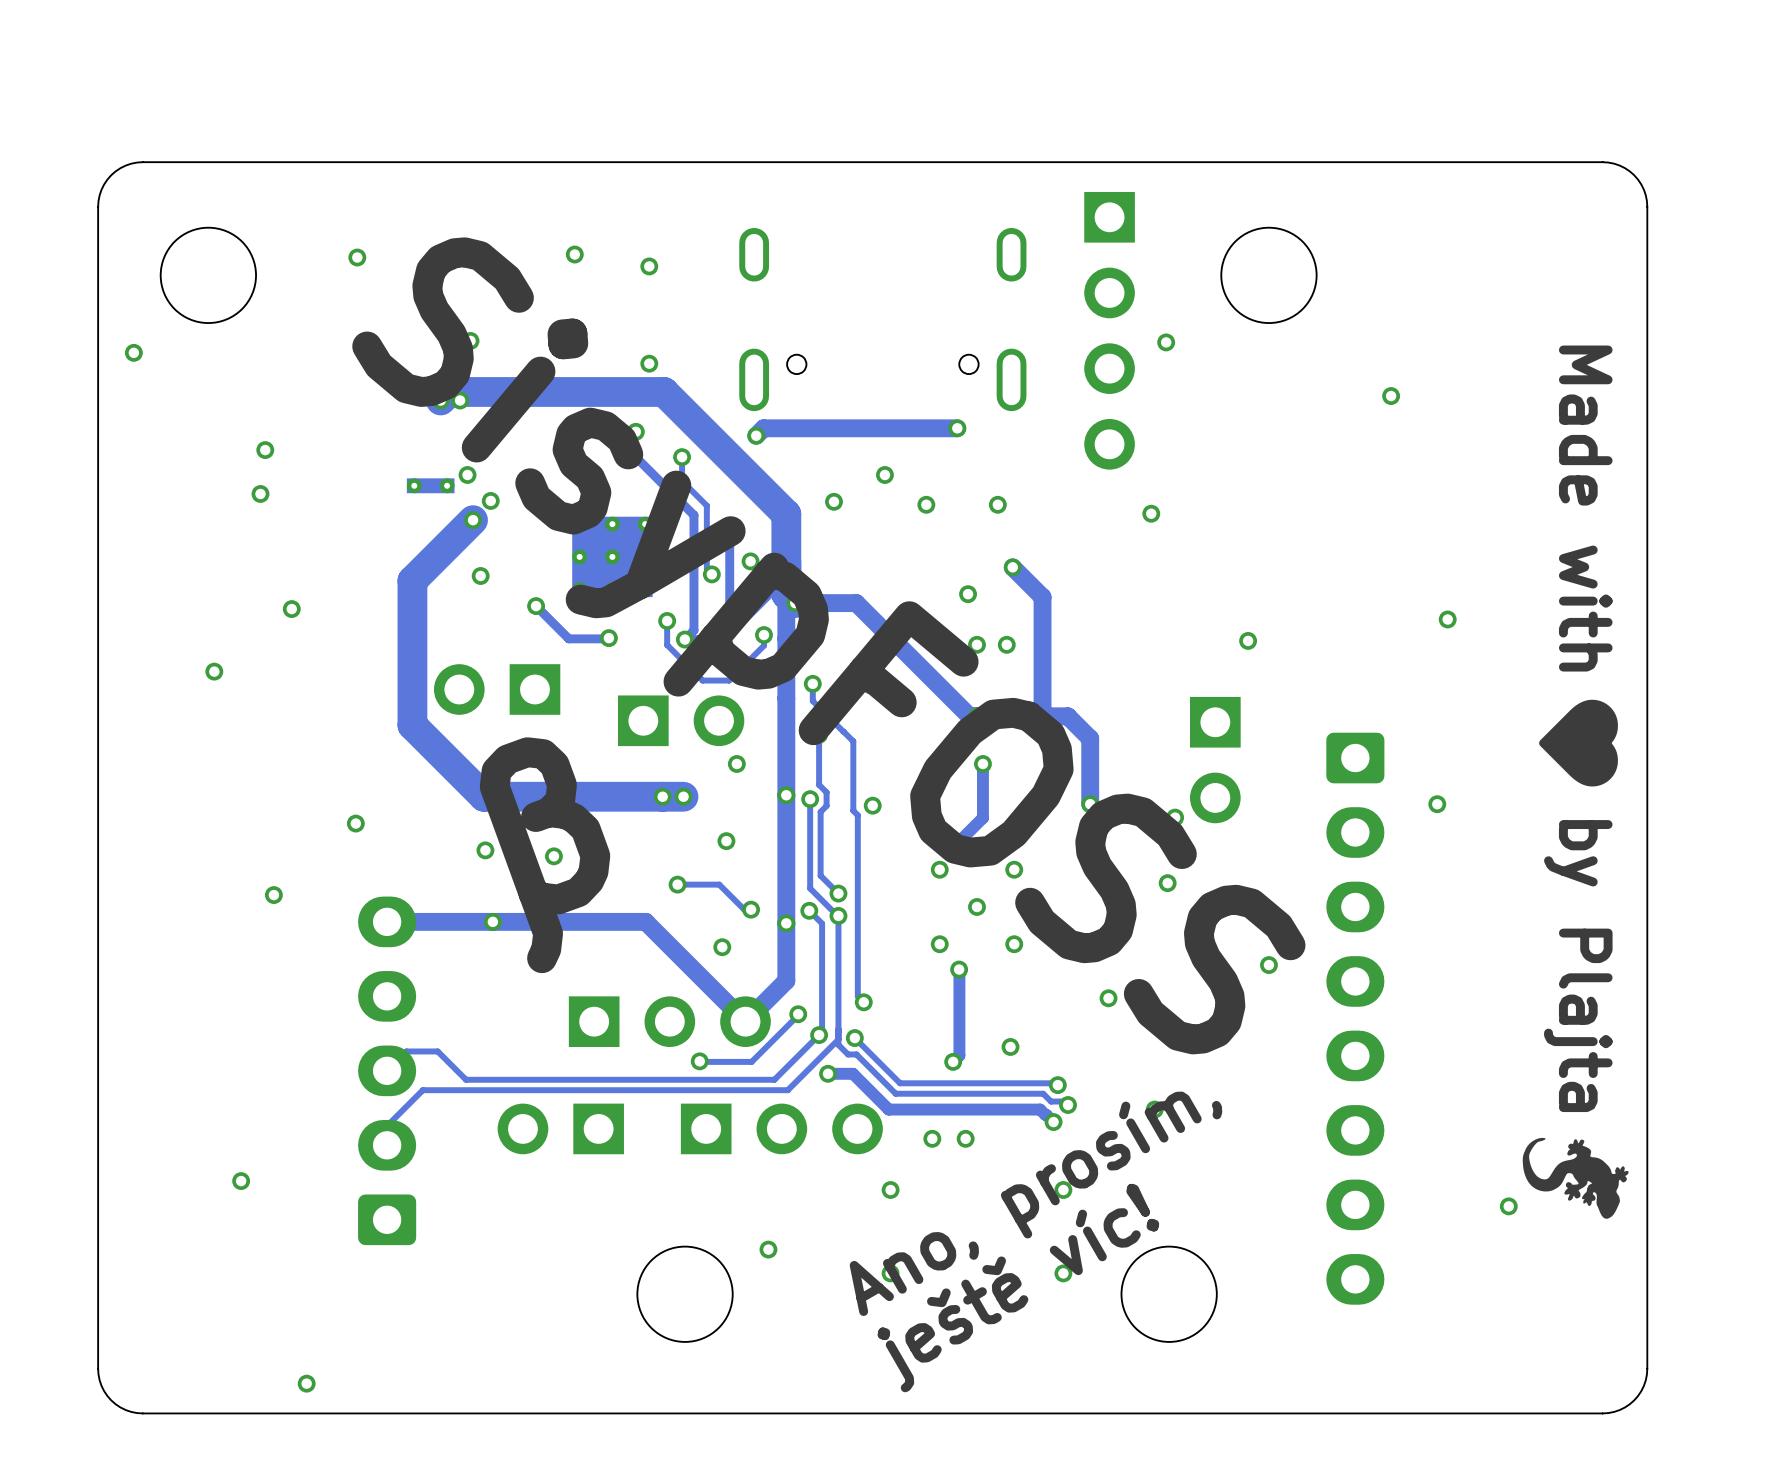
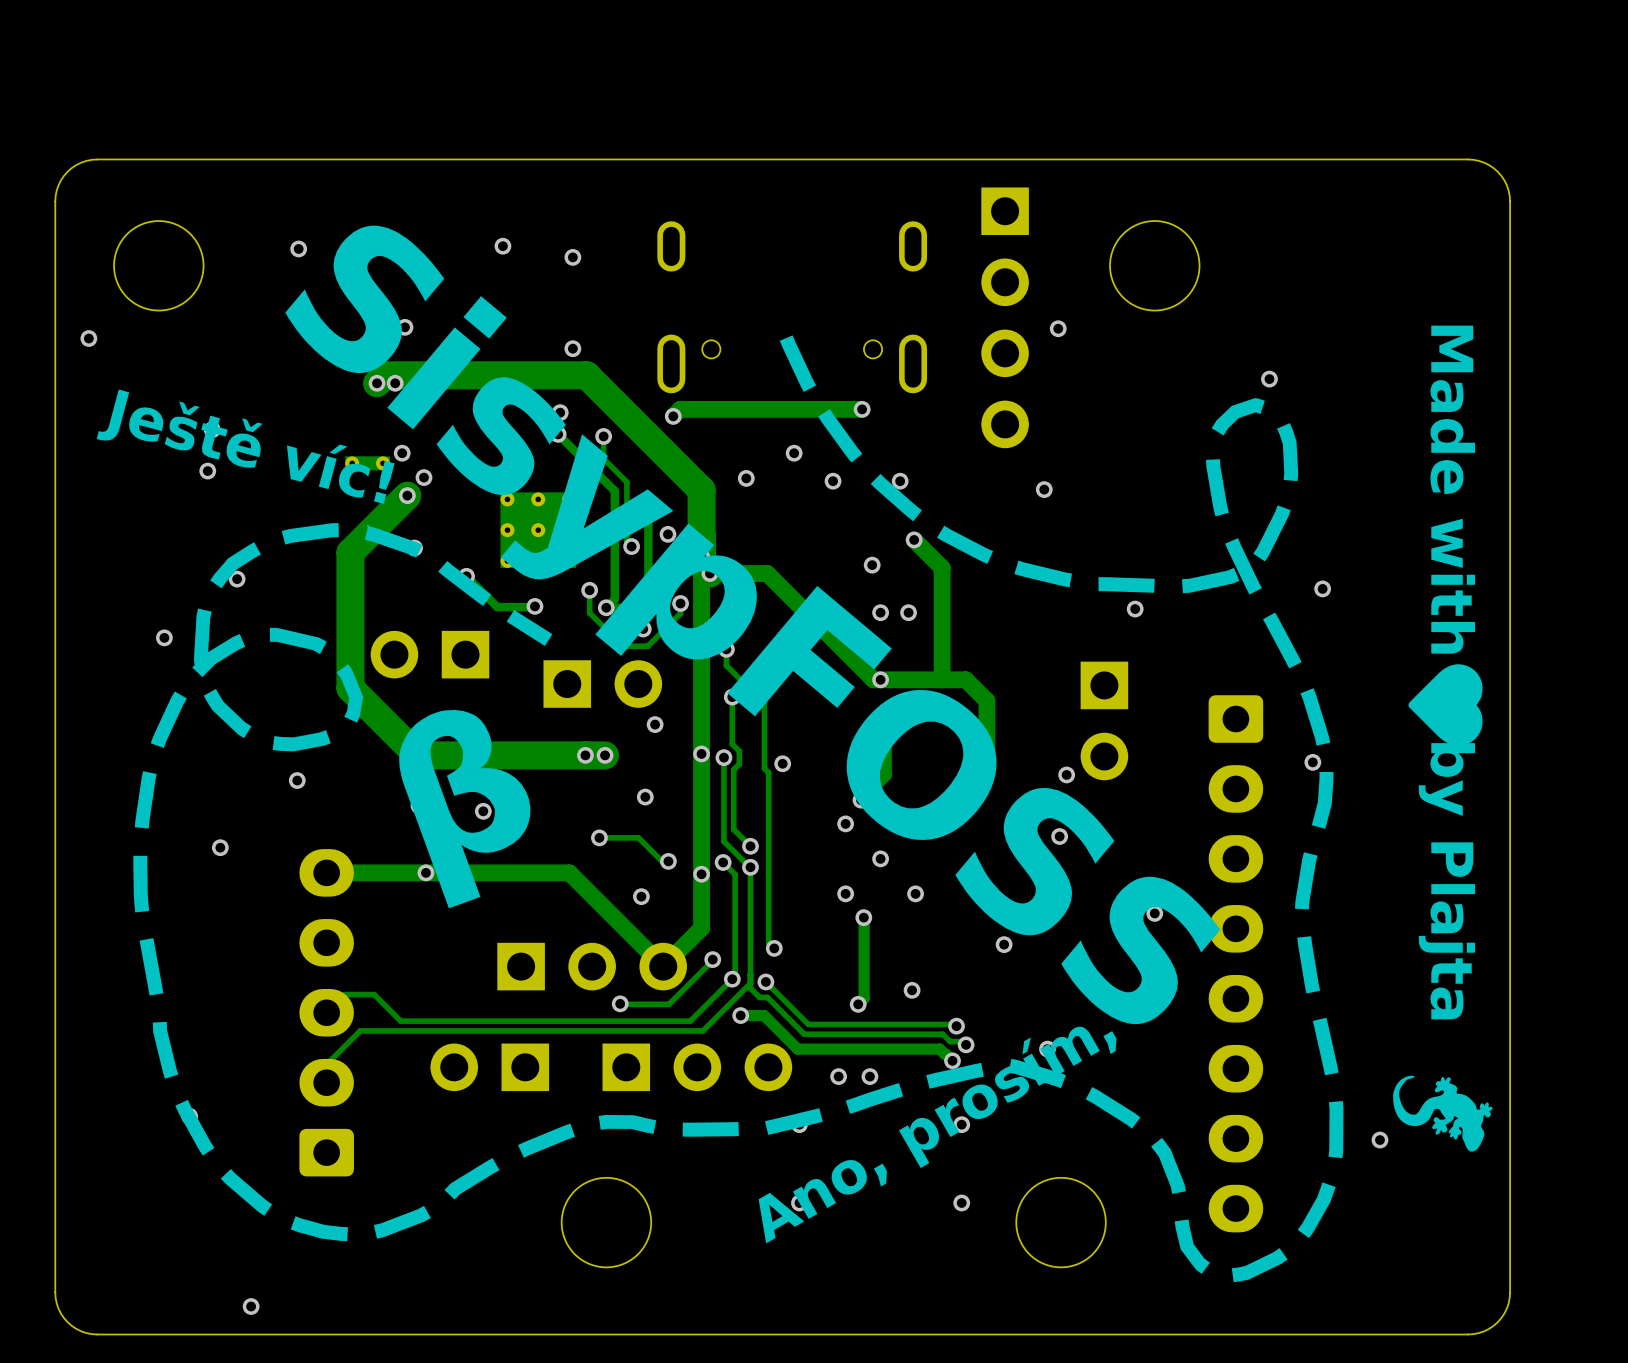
drawing: none -> [133, 335, 1344, 1283]
text: none -> Ještě víc! (245, 446)
via: (768, 1249) -> none
text: ještě víc! (1018, 1288) -> none

